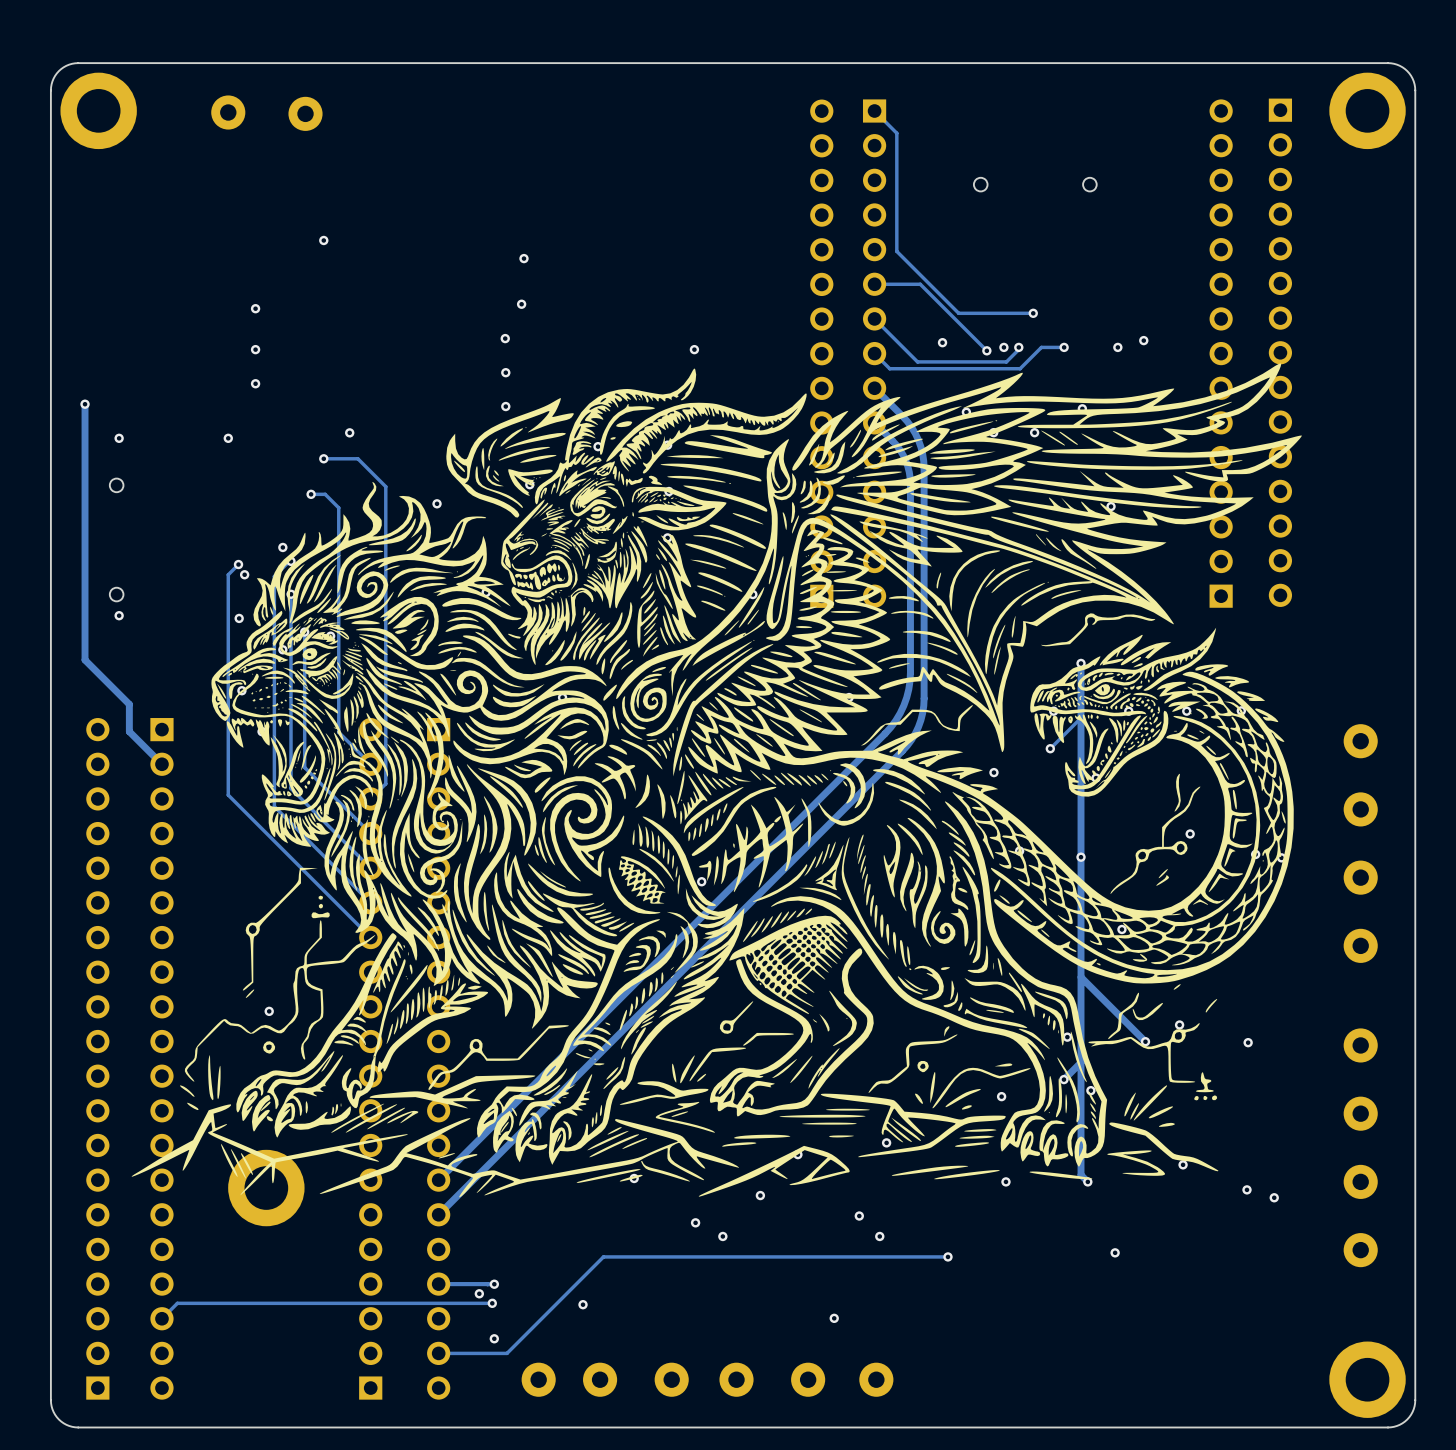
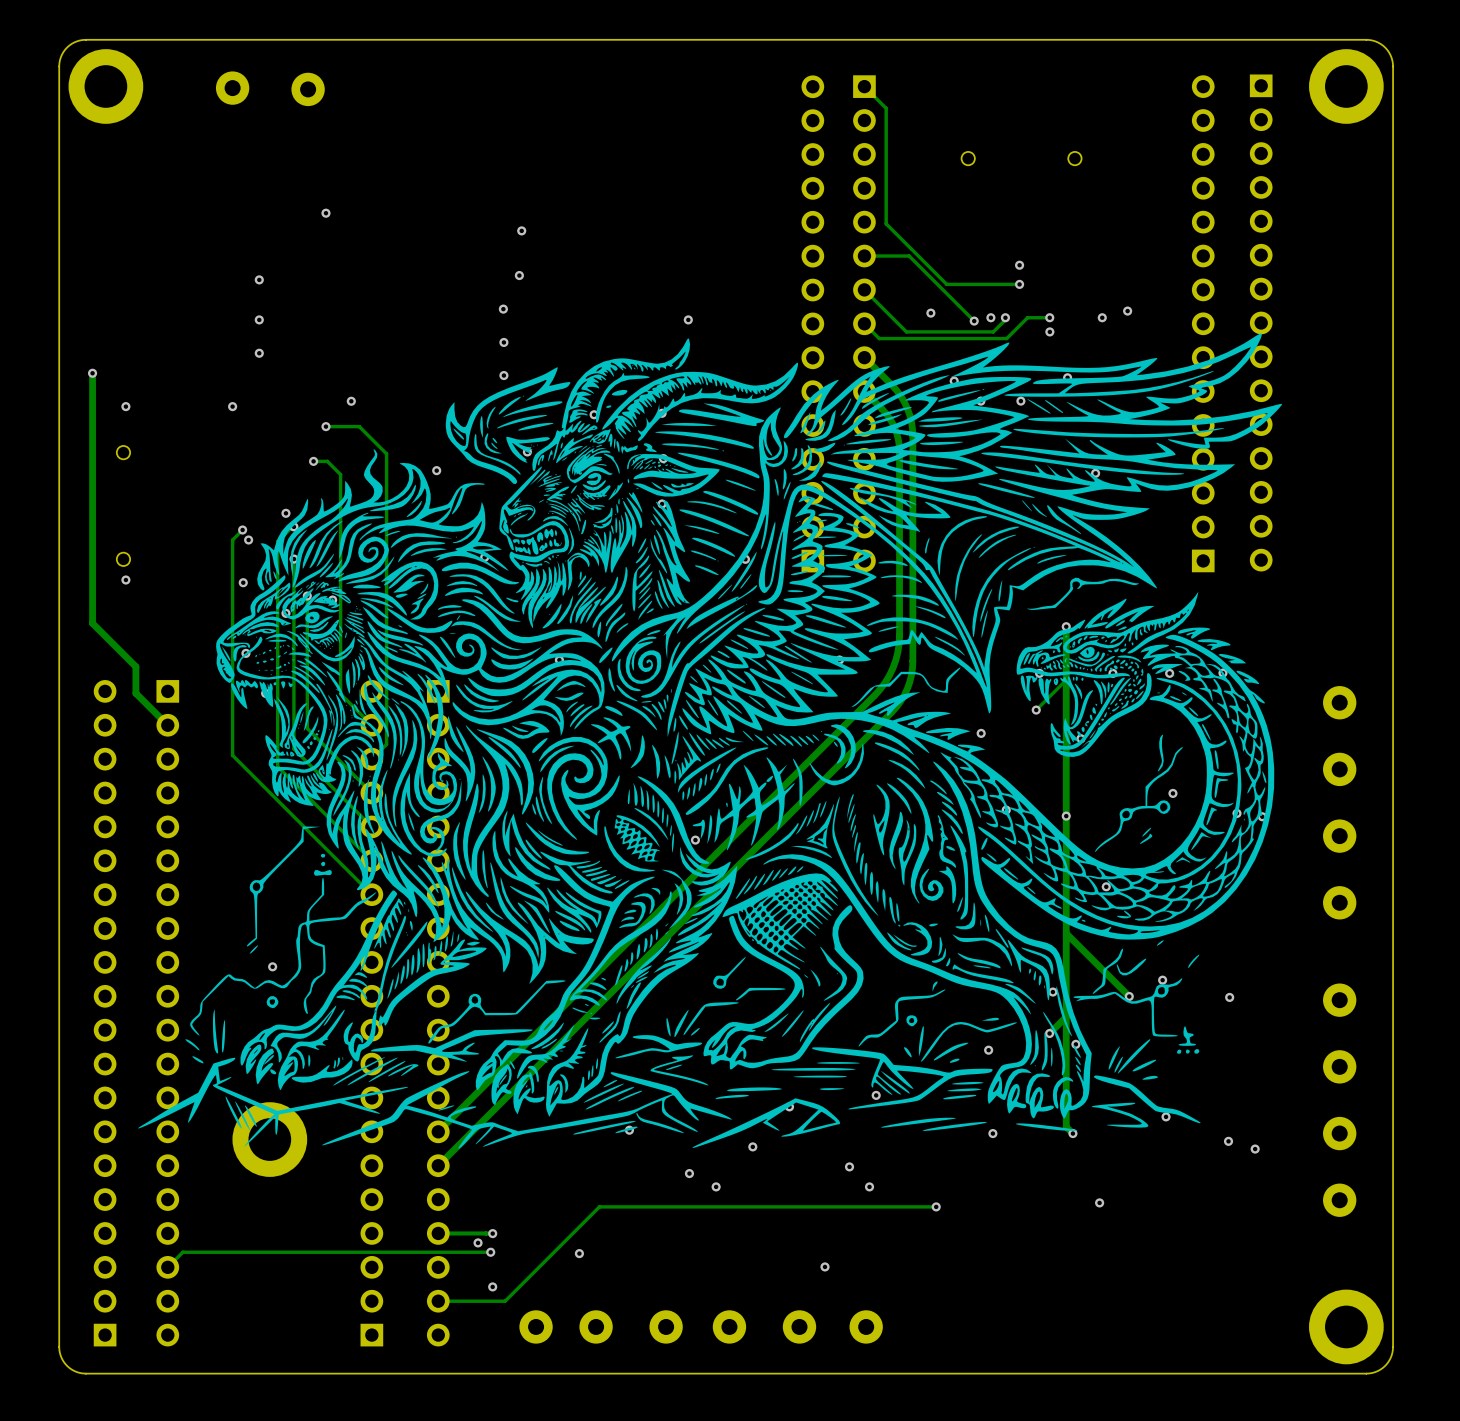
via: none -> (1019, 265)
via: none -> (1049, 331)

